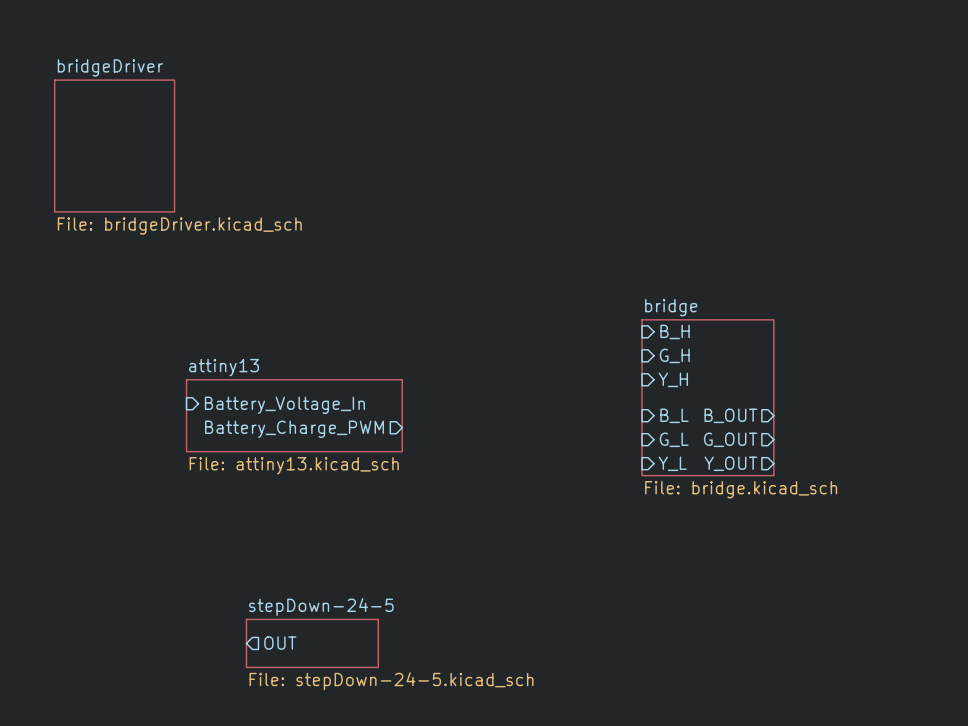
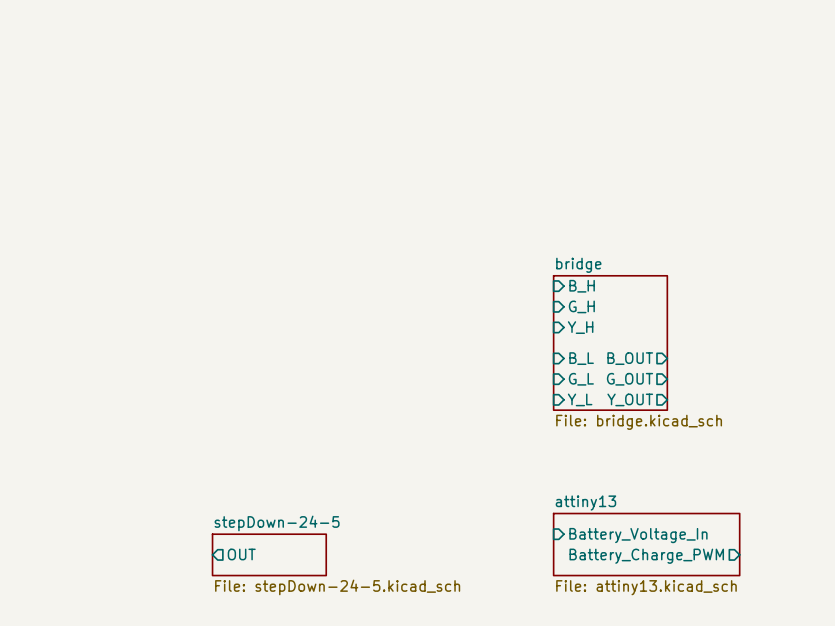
sheet bridgeDriver: File: bridgeDriver.kicad_sch (114, 146) -> none
sheet pin: Battery_Voltage_In (284, 405) -> none
sheet attiny13 position: (294, 415) -> (646, 544)
sheet pin: Battery_Charge_PWM (294, 429) -> none
sheet pin: none -> Battery_Voltage_In (638, 535)
sheet pin: none -> Battery_Charge_PWM (646, 556)

